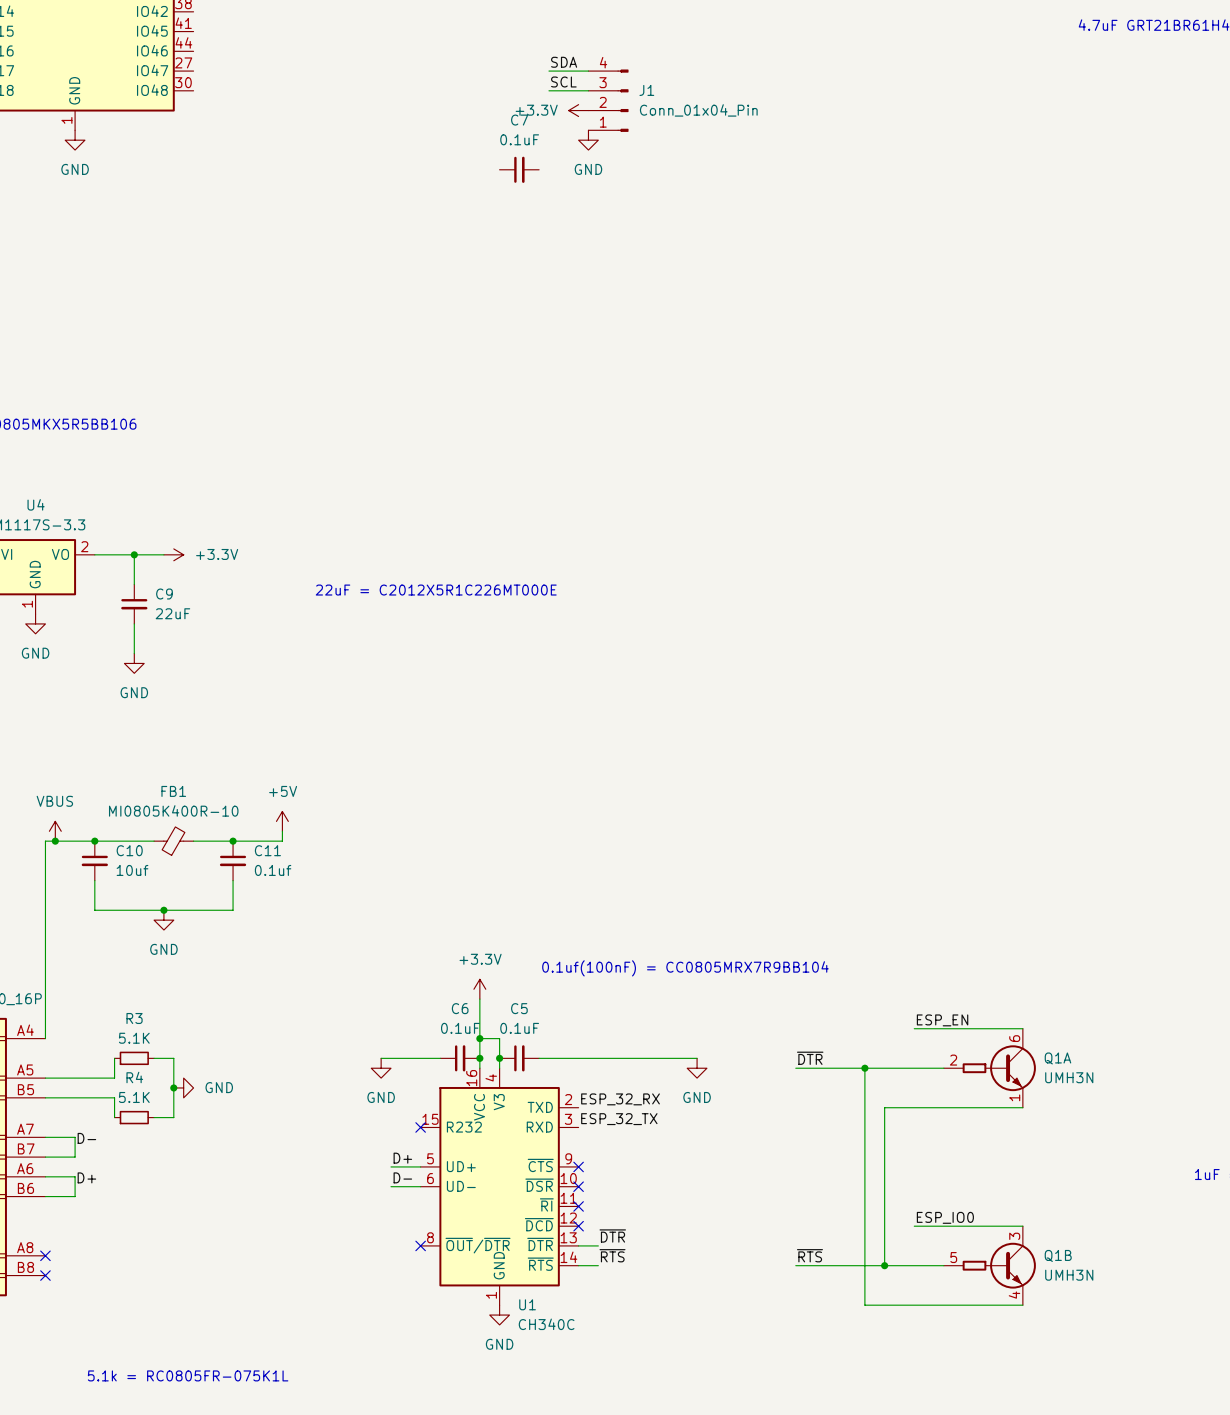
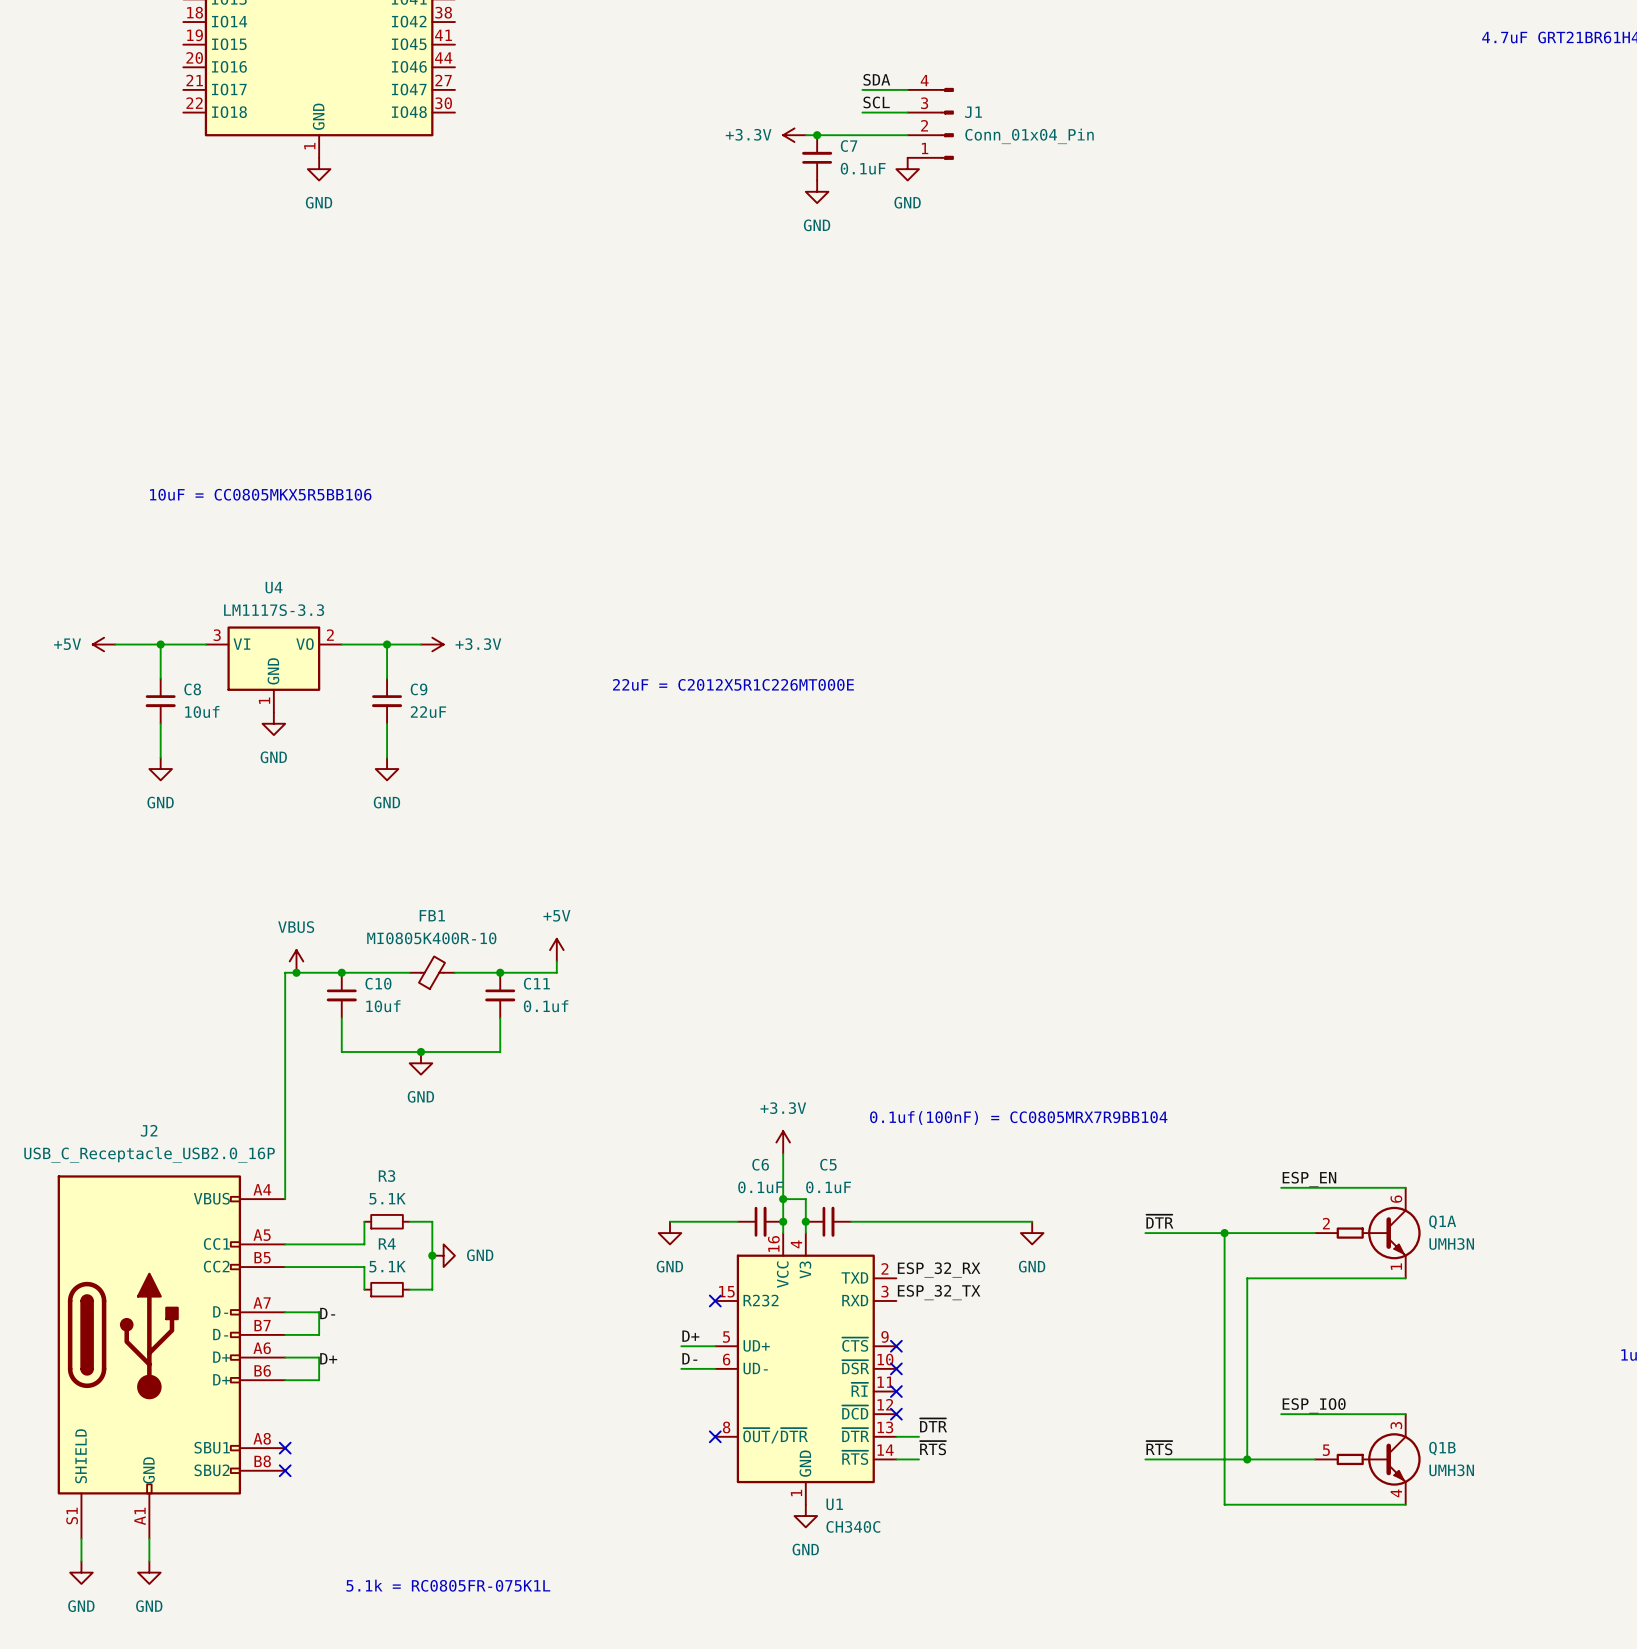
wire: none -> (805, 135) (907, 135)
junction: none -> (817, 135)
power symbol position: +3.3V (578, 110) -> +3.3V (794, 135)
C7 name position: C7 (519, 120) -> C7 (849, 146)
C7 value position: 0.1uF (519, 139) -> 0.1uF (863, 168)
power symbol: none -> GND (817, 191)
C7 rotation: 0° (519, 169) -> 90° counterclockwise (817, 157)
C7 position: (519, 169) -> (817, 157)

